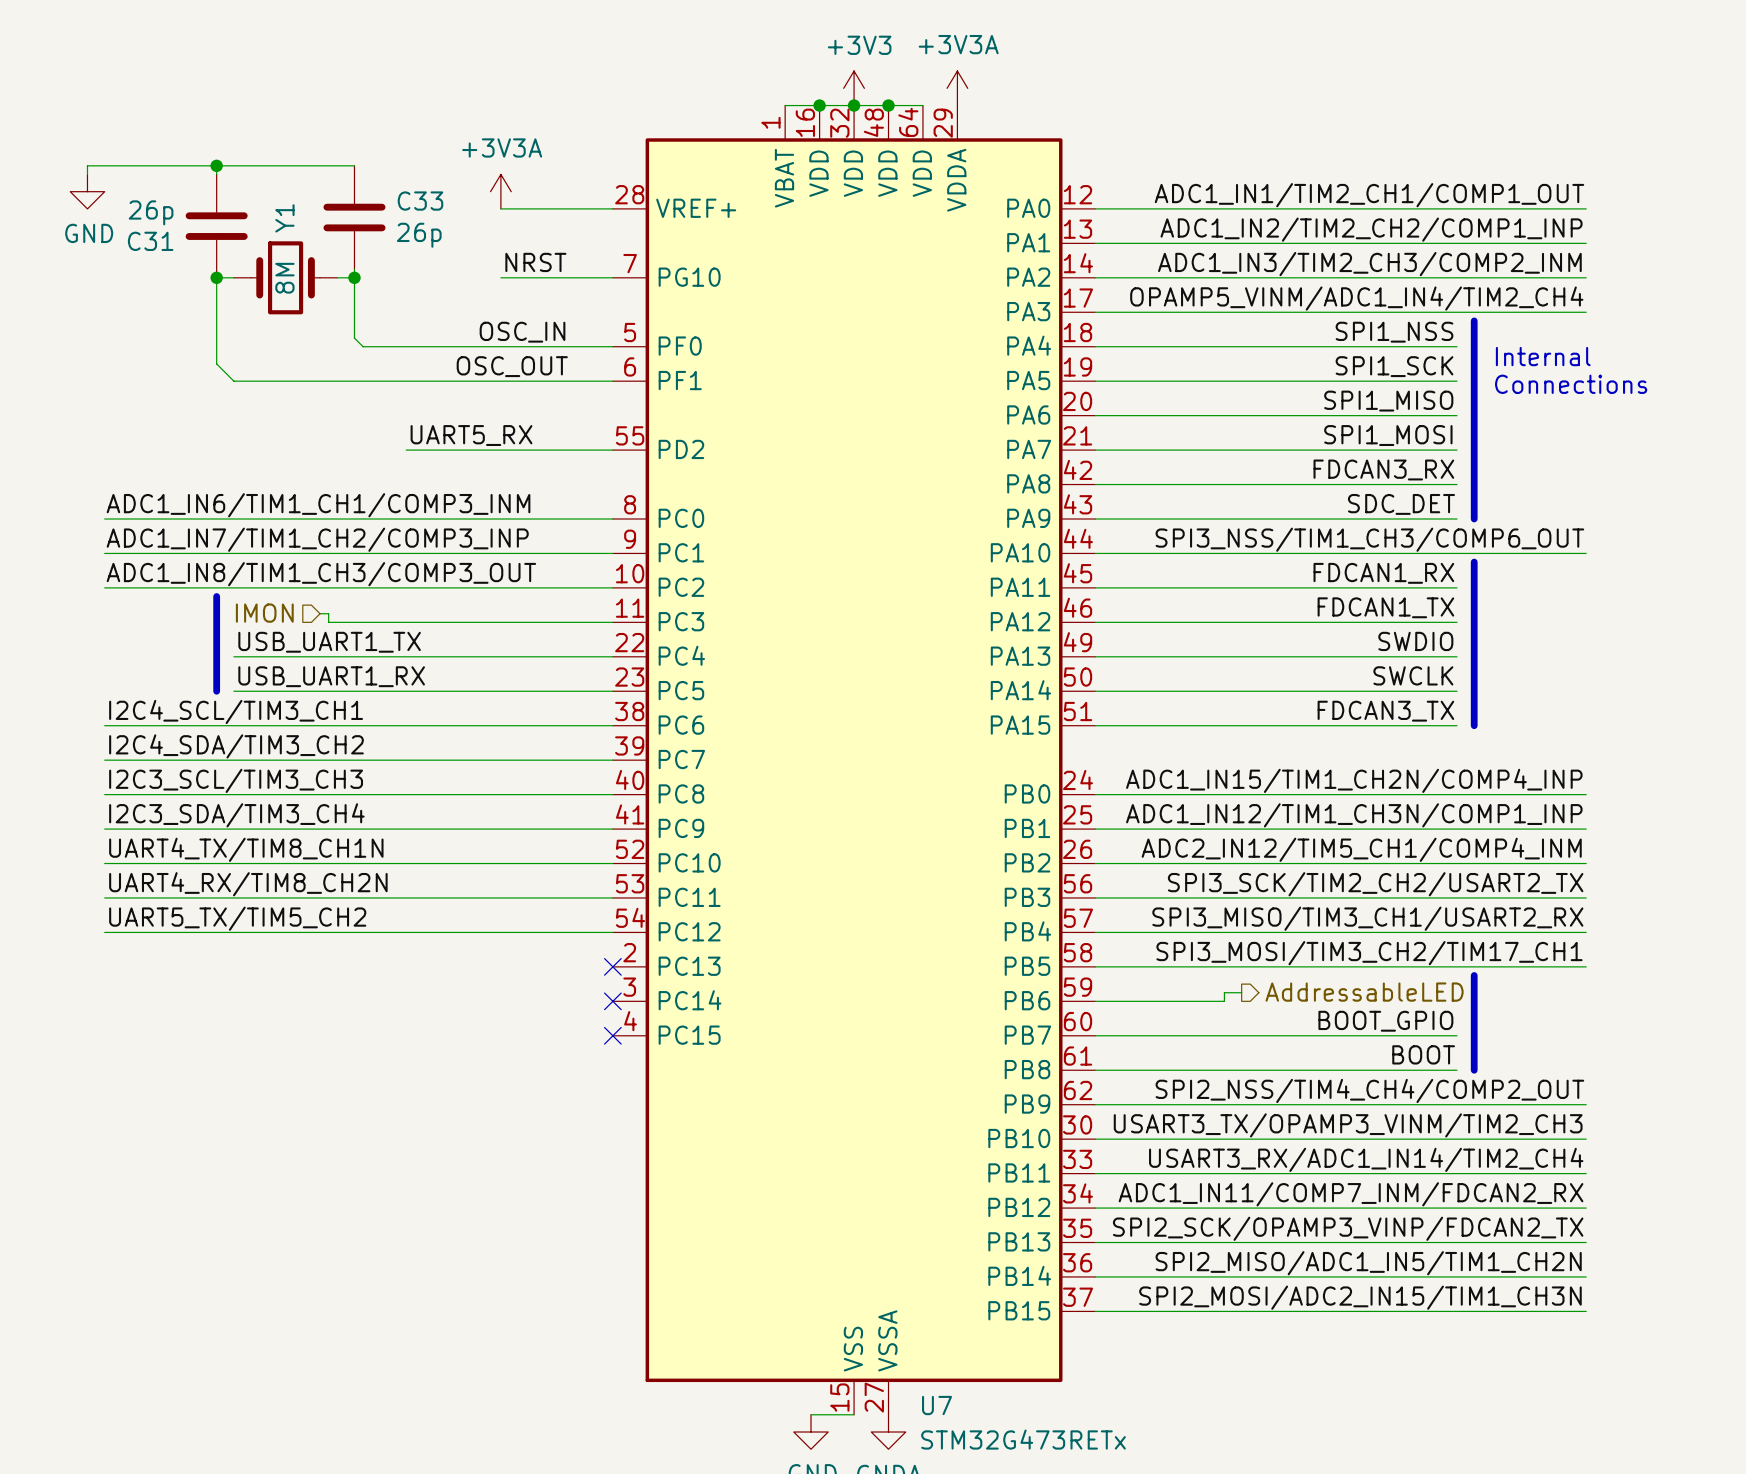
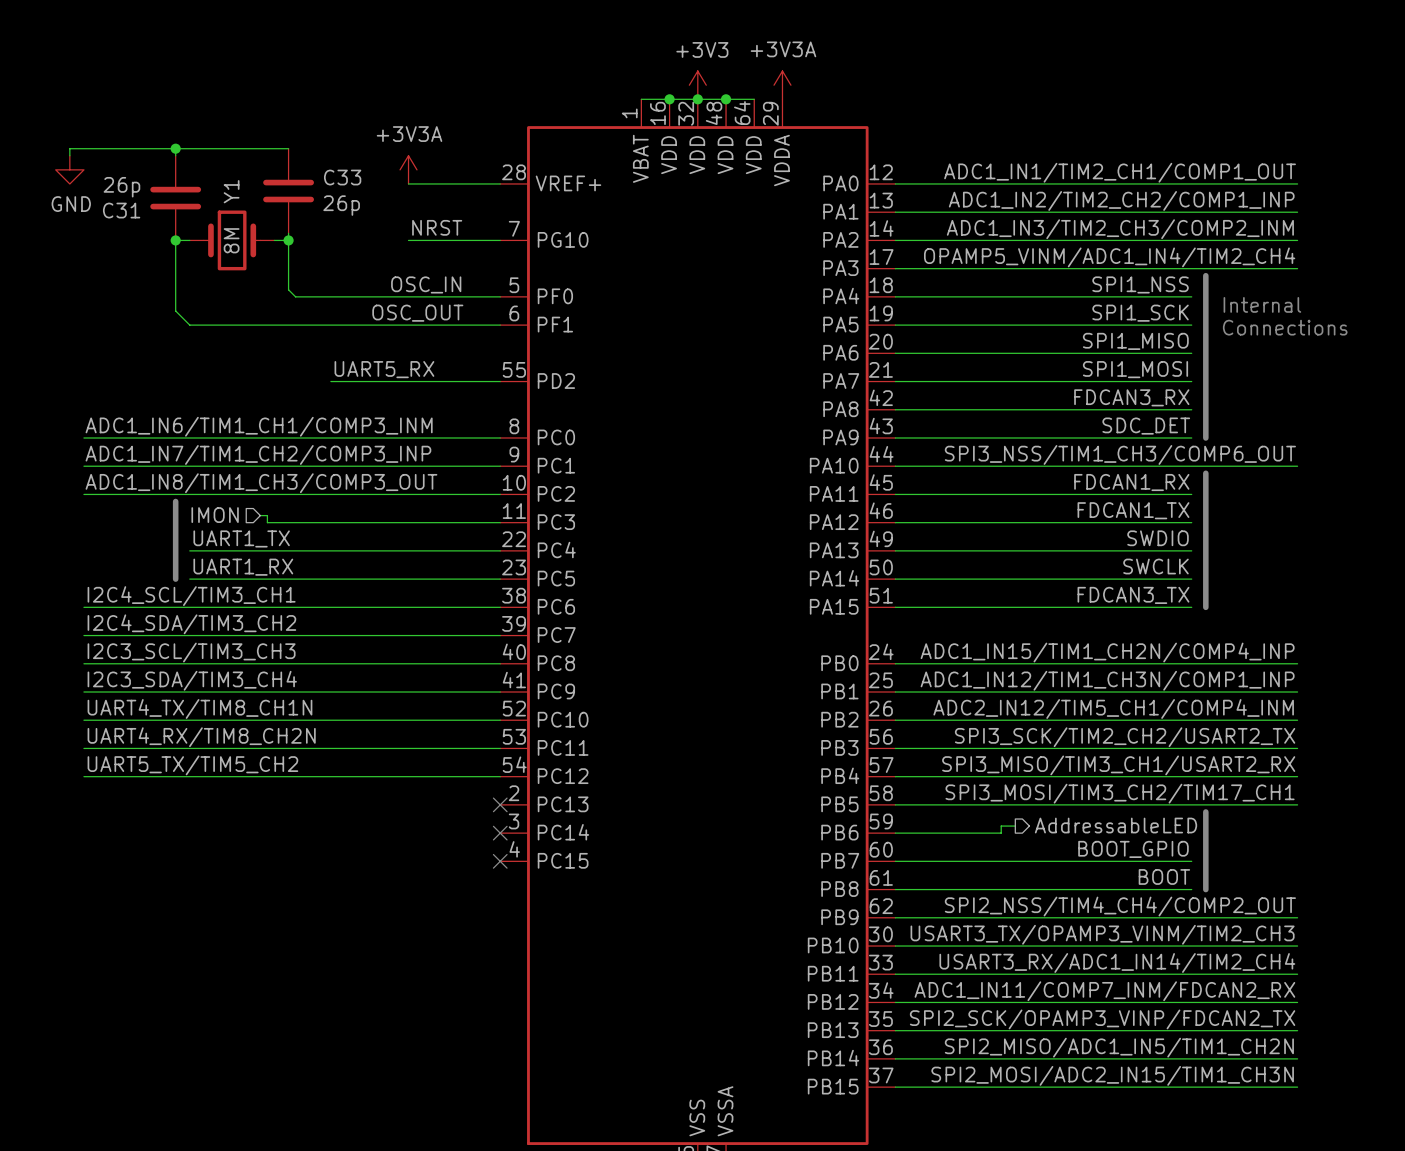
label: USB_UART1_TX (329, 642) -> UART1_TX (241, 538)
label: USB_UART1_RX (331, 676) -> UART1_RX (243, 567)

